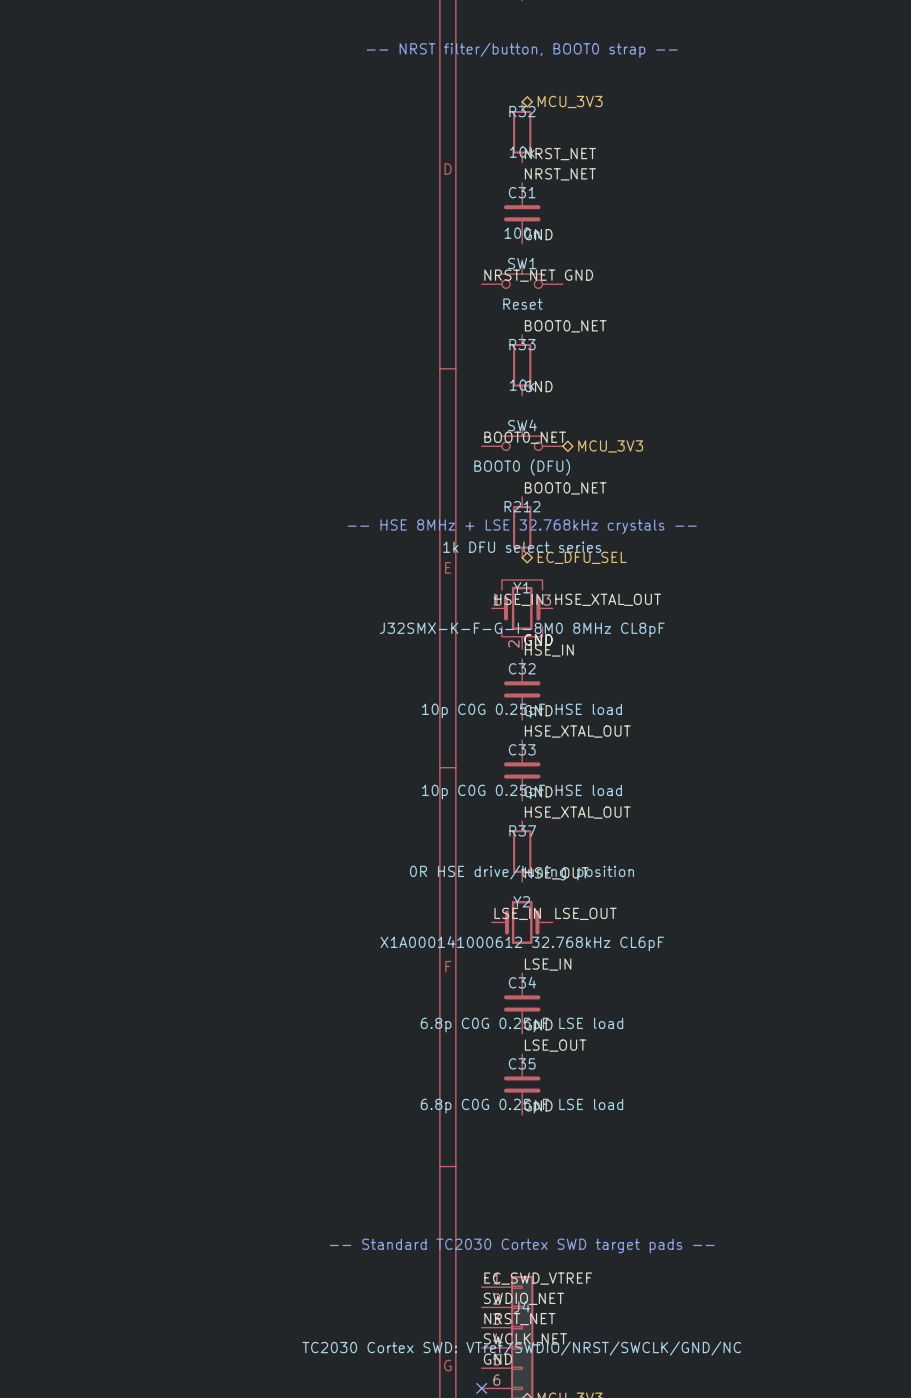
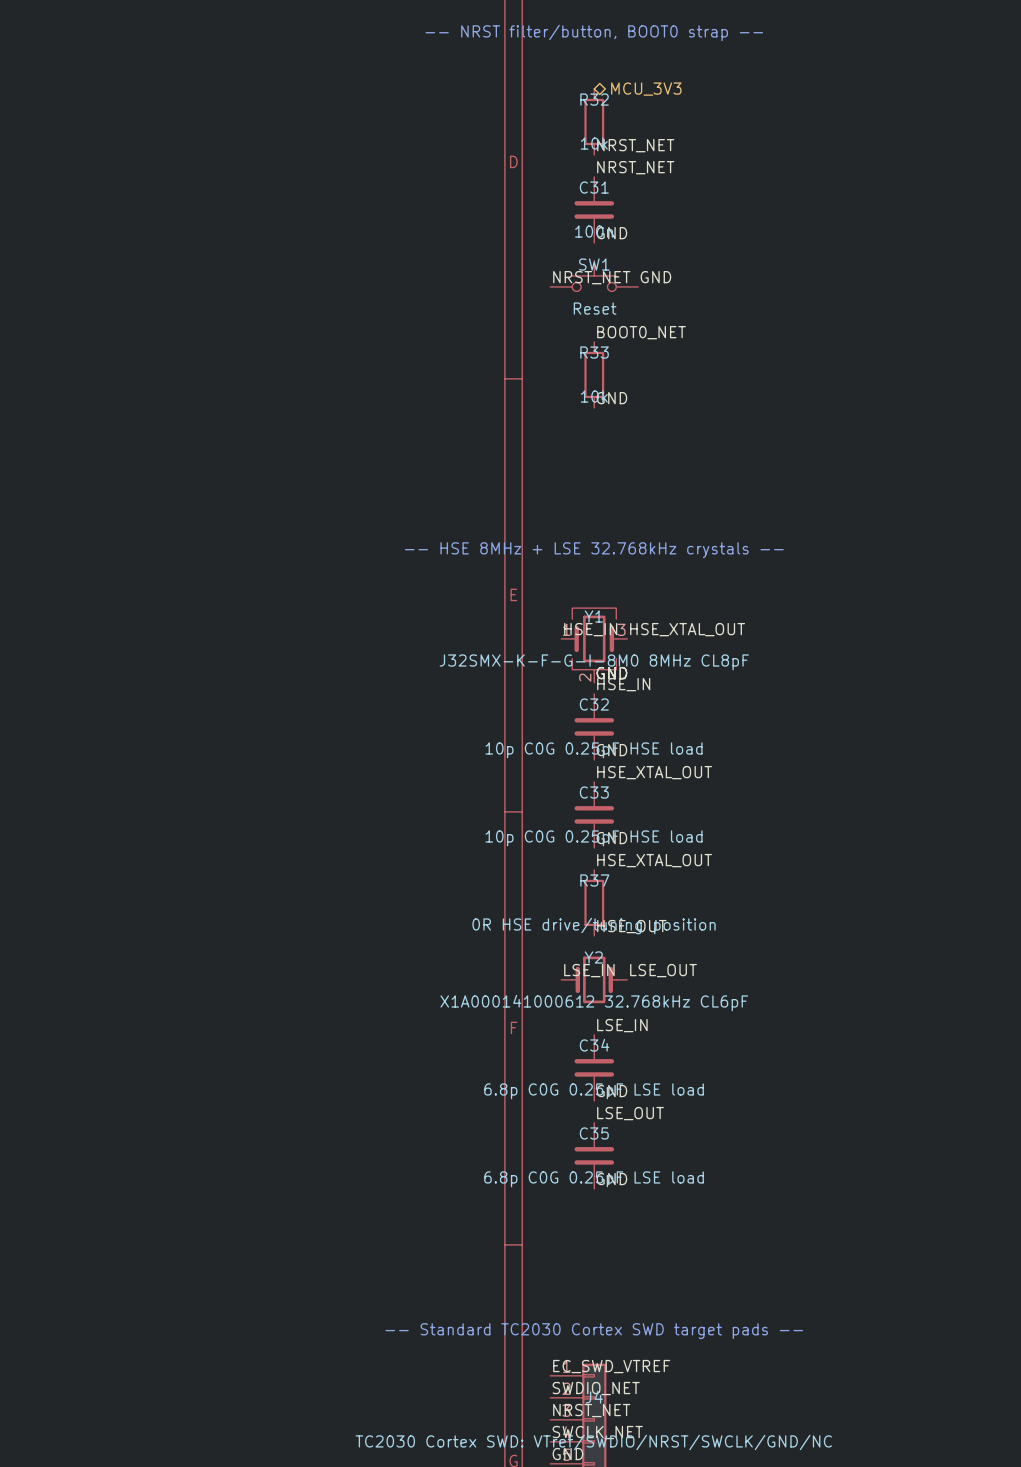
SW4: BOOT0 (DFU) (522, 436) -> none
label: BOOT0_NET (525, 437) -> none
hierarchical label: MCU_3V3 (610, 446) -> none
label: BOOT0_NET (565, 488) -> none
R212: 1k DFU select series (522, 527) -> none
hierarchical label: EC_DFU_SEL (582, 557) -> none

